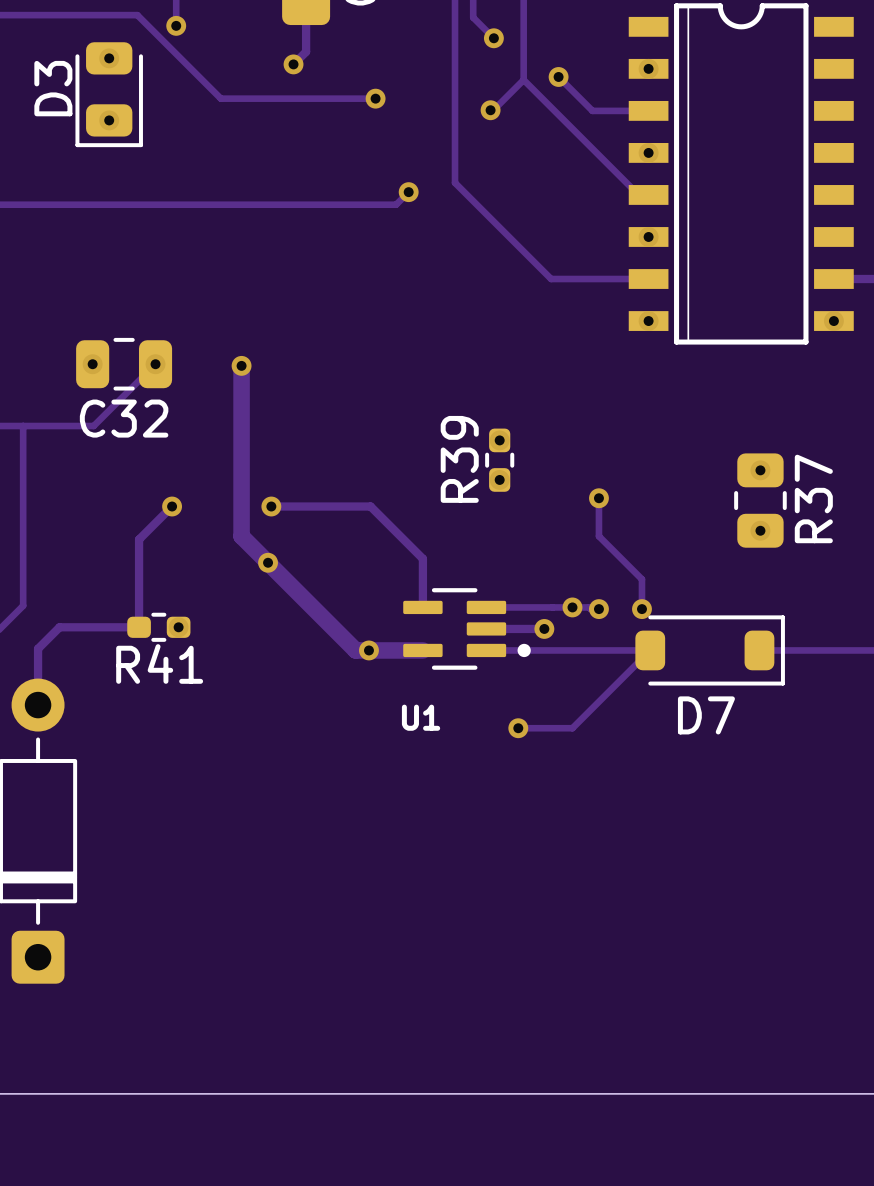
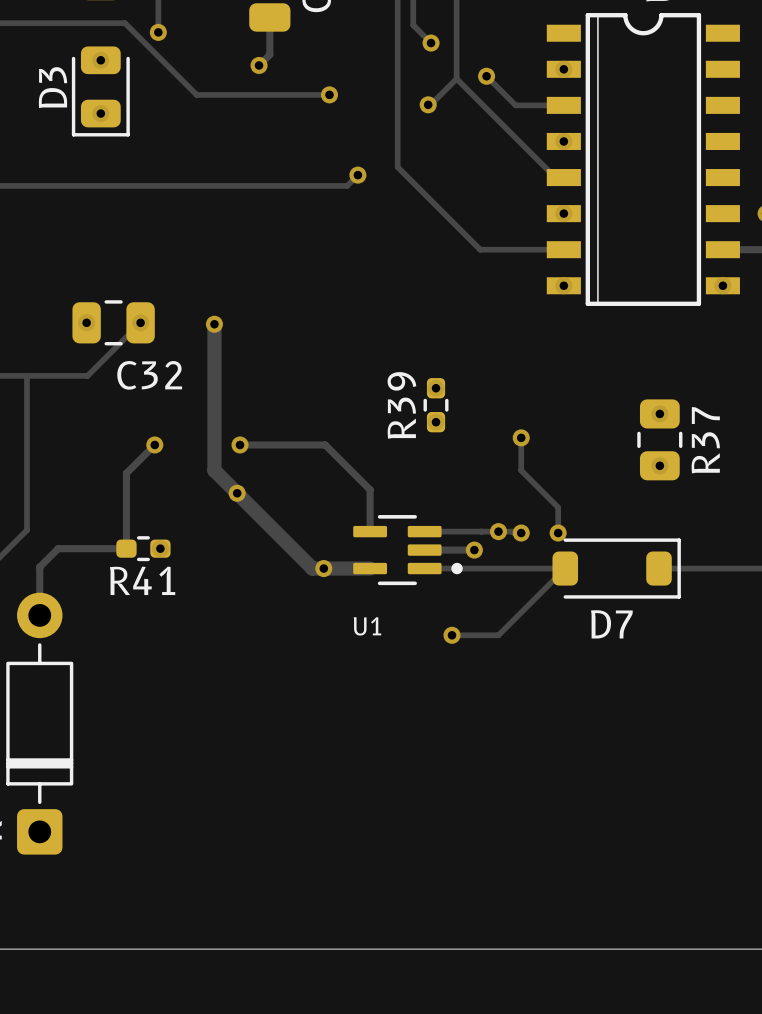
C32 name position: C32 (124, 418) -> C32 (149, 375)

